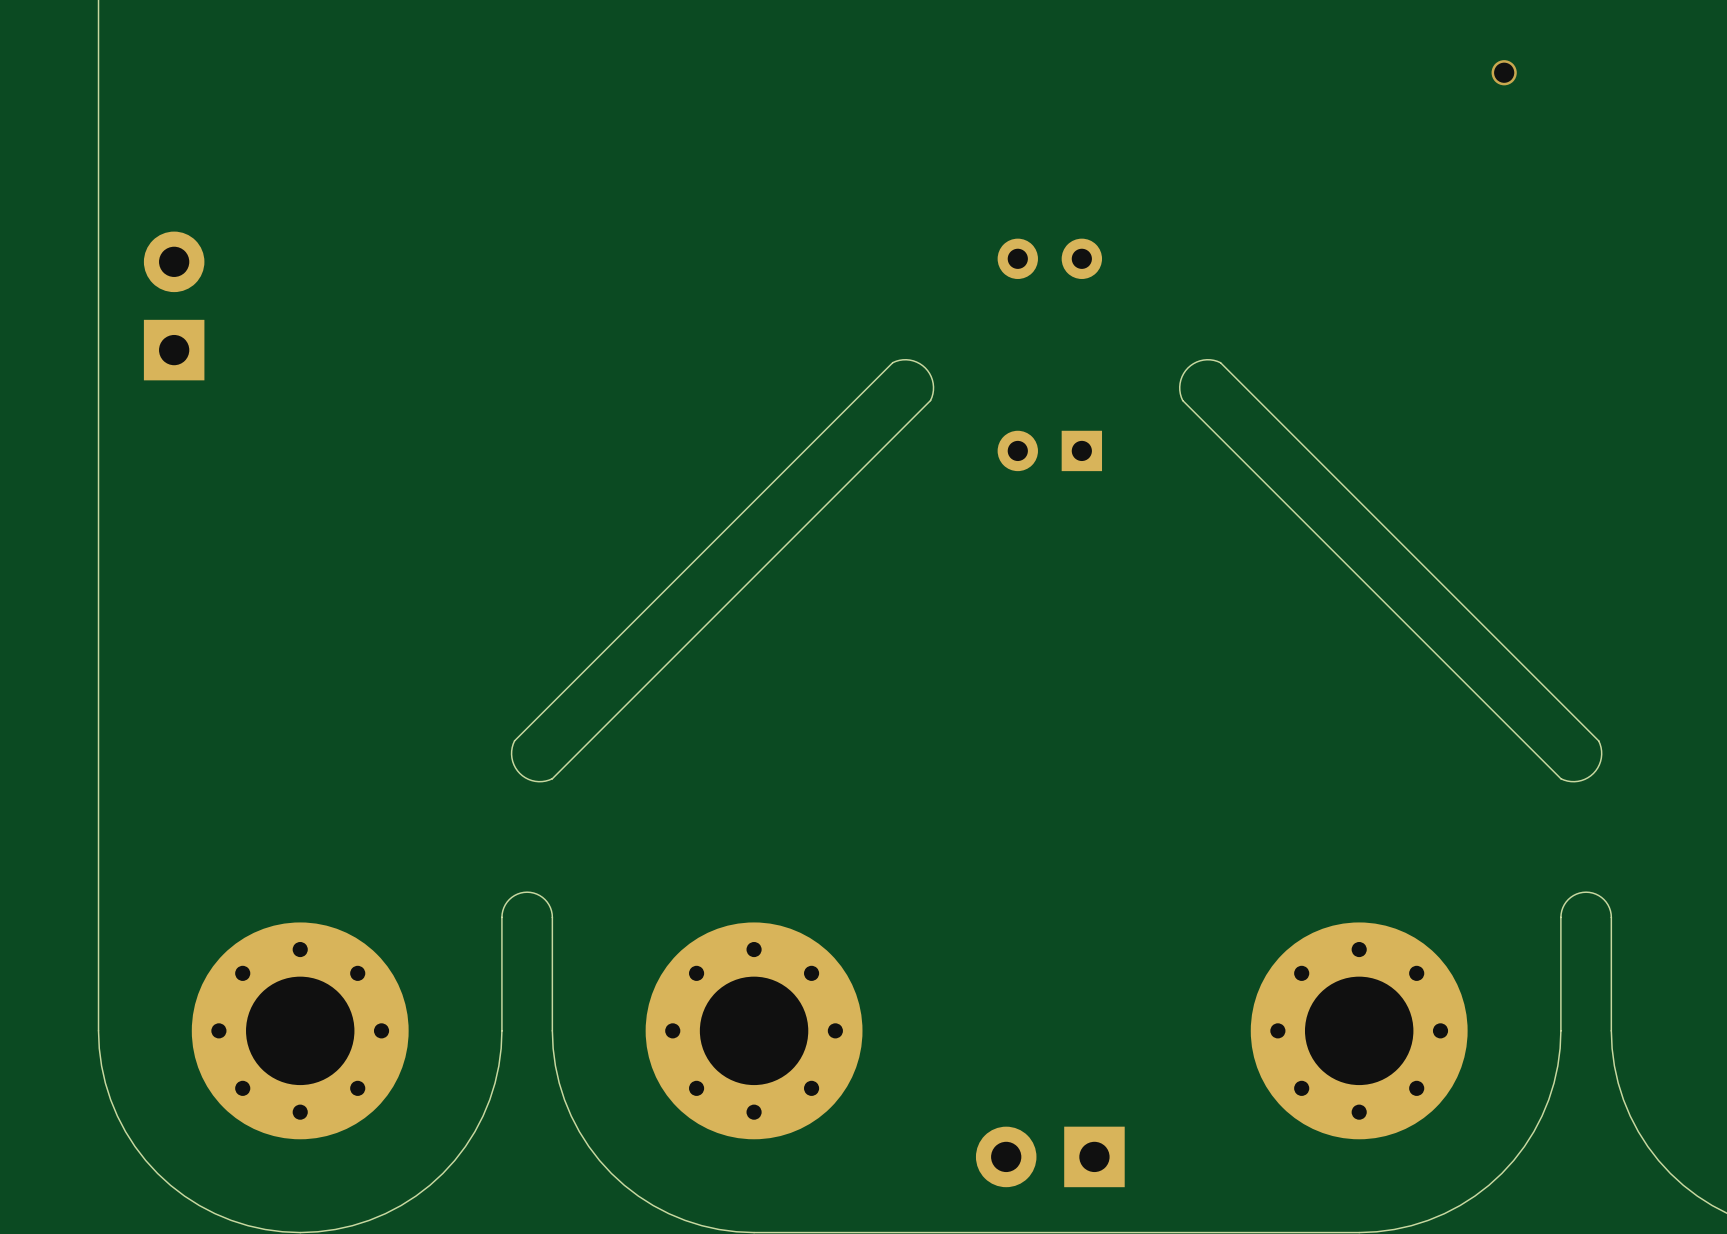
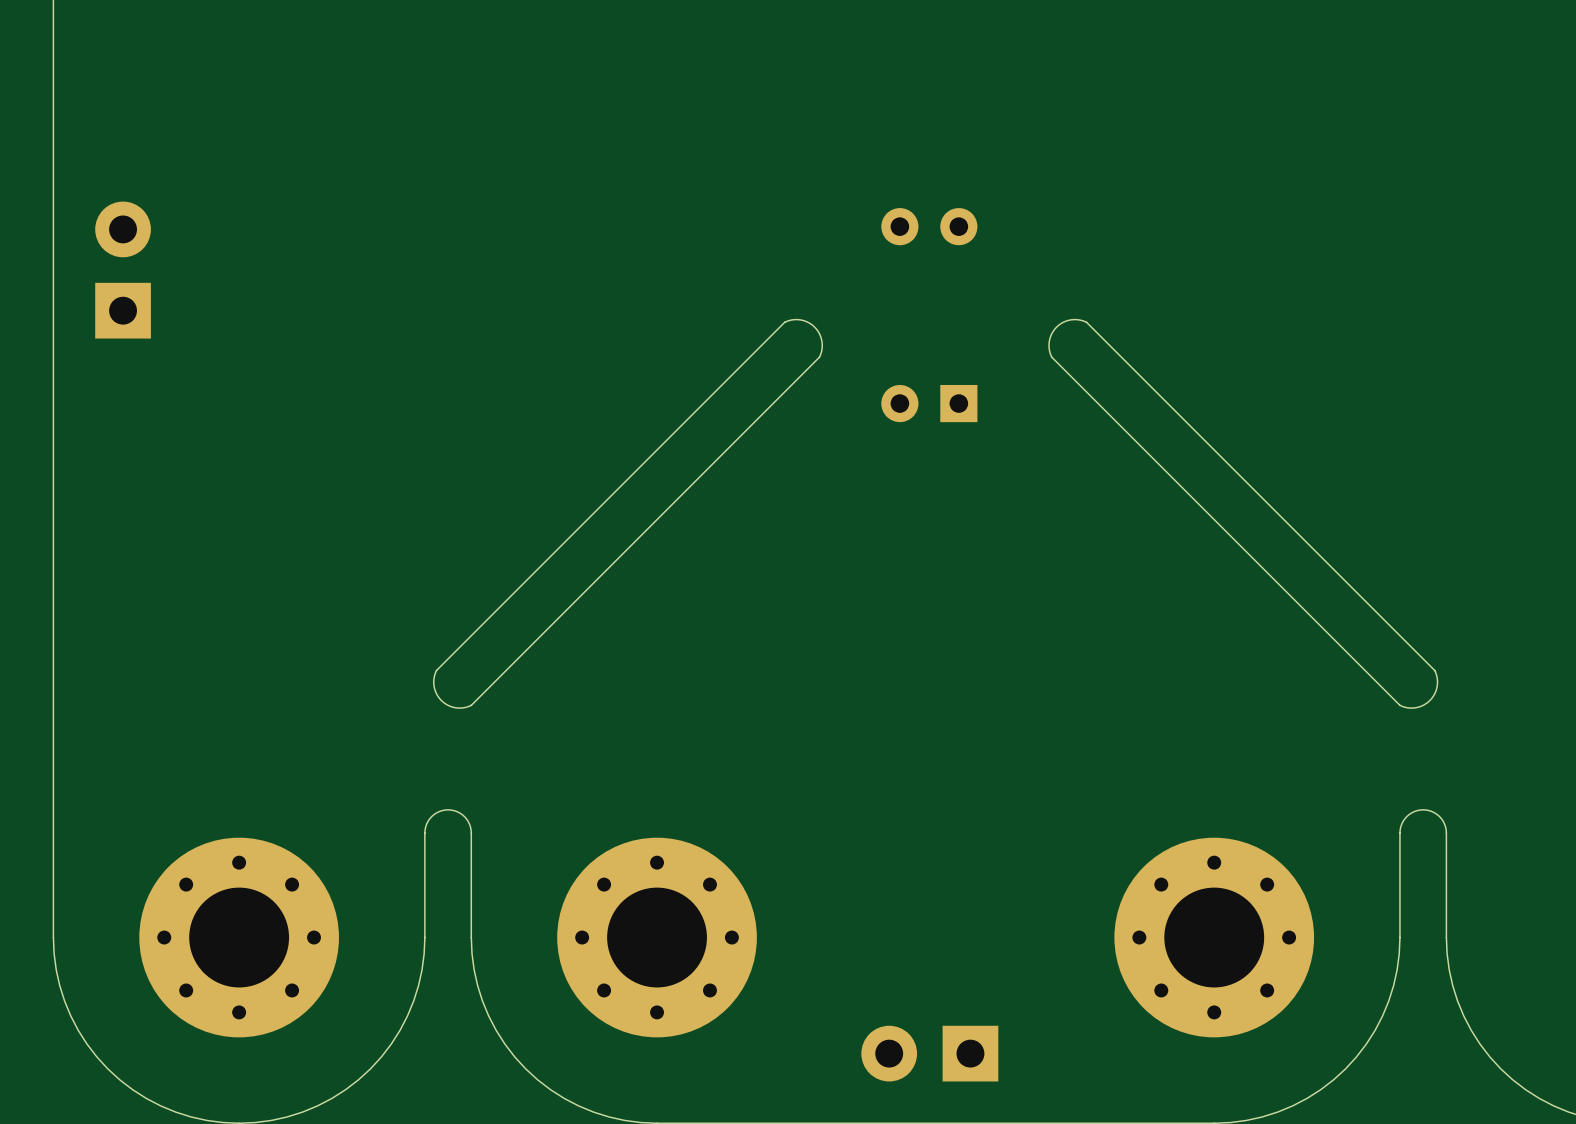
via: (1504, 72) -> none

